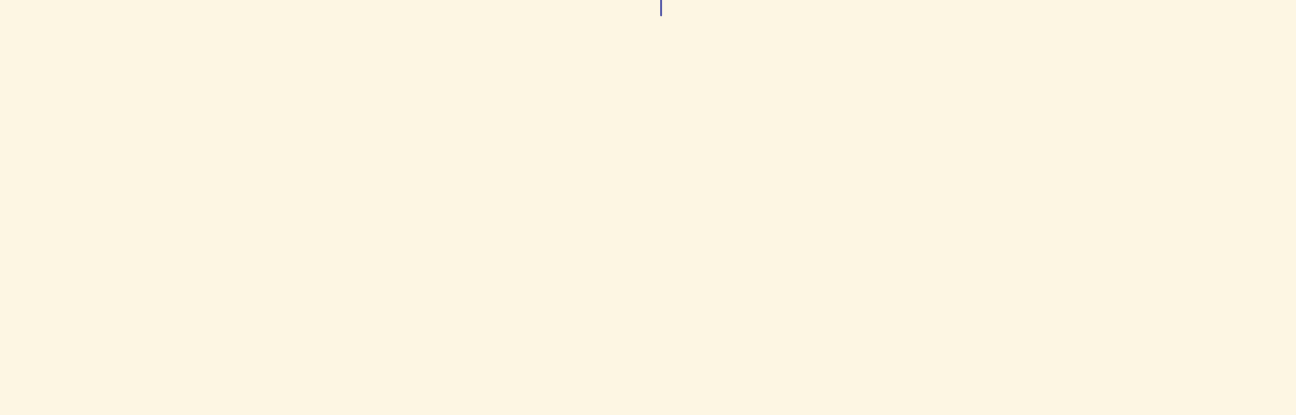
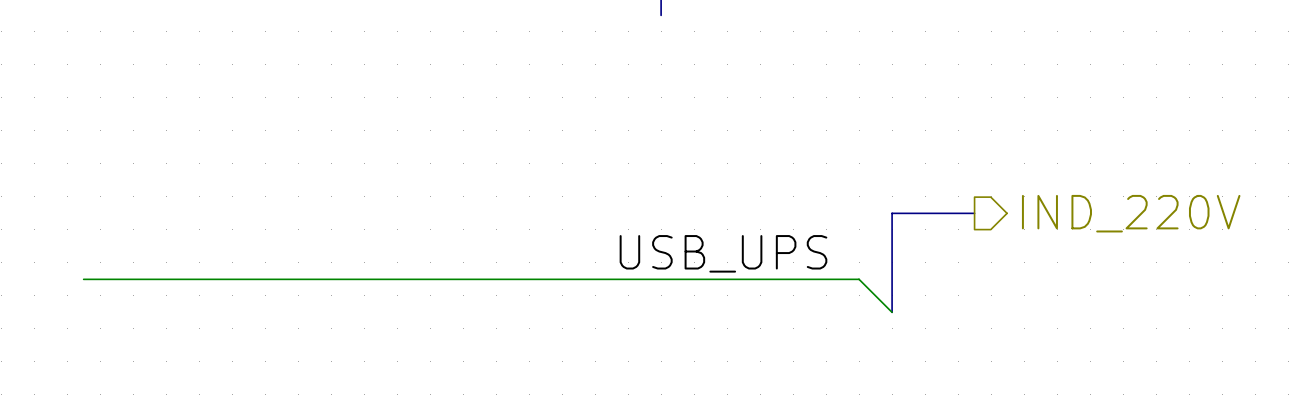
bus: none -> (974, 213) (892, 213) (892, 312)
hierarchical label: none -> IND_220V (1131, 213)
label: none -> USB_UPS (723, 253)
wire: none -> (83, 279) (859, 279) (892, 312)

